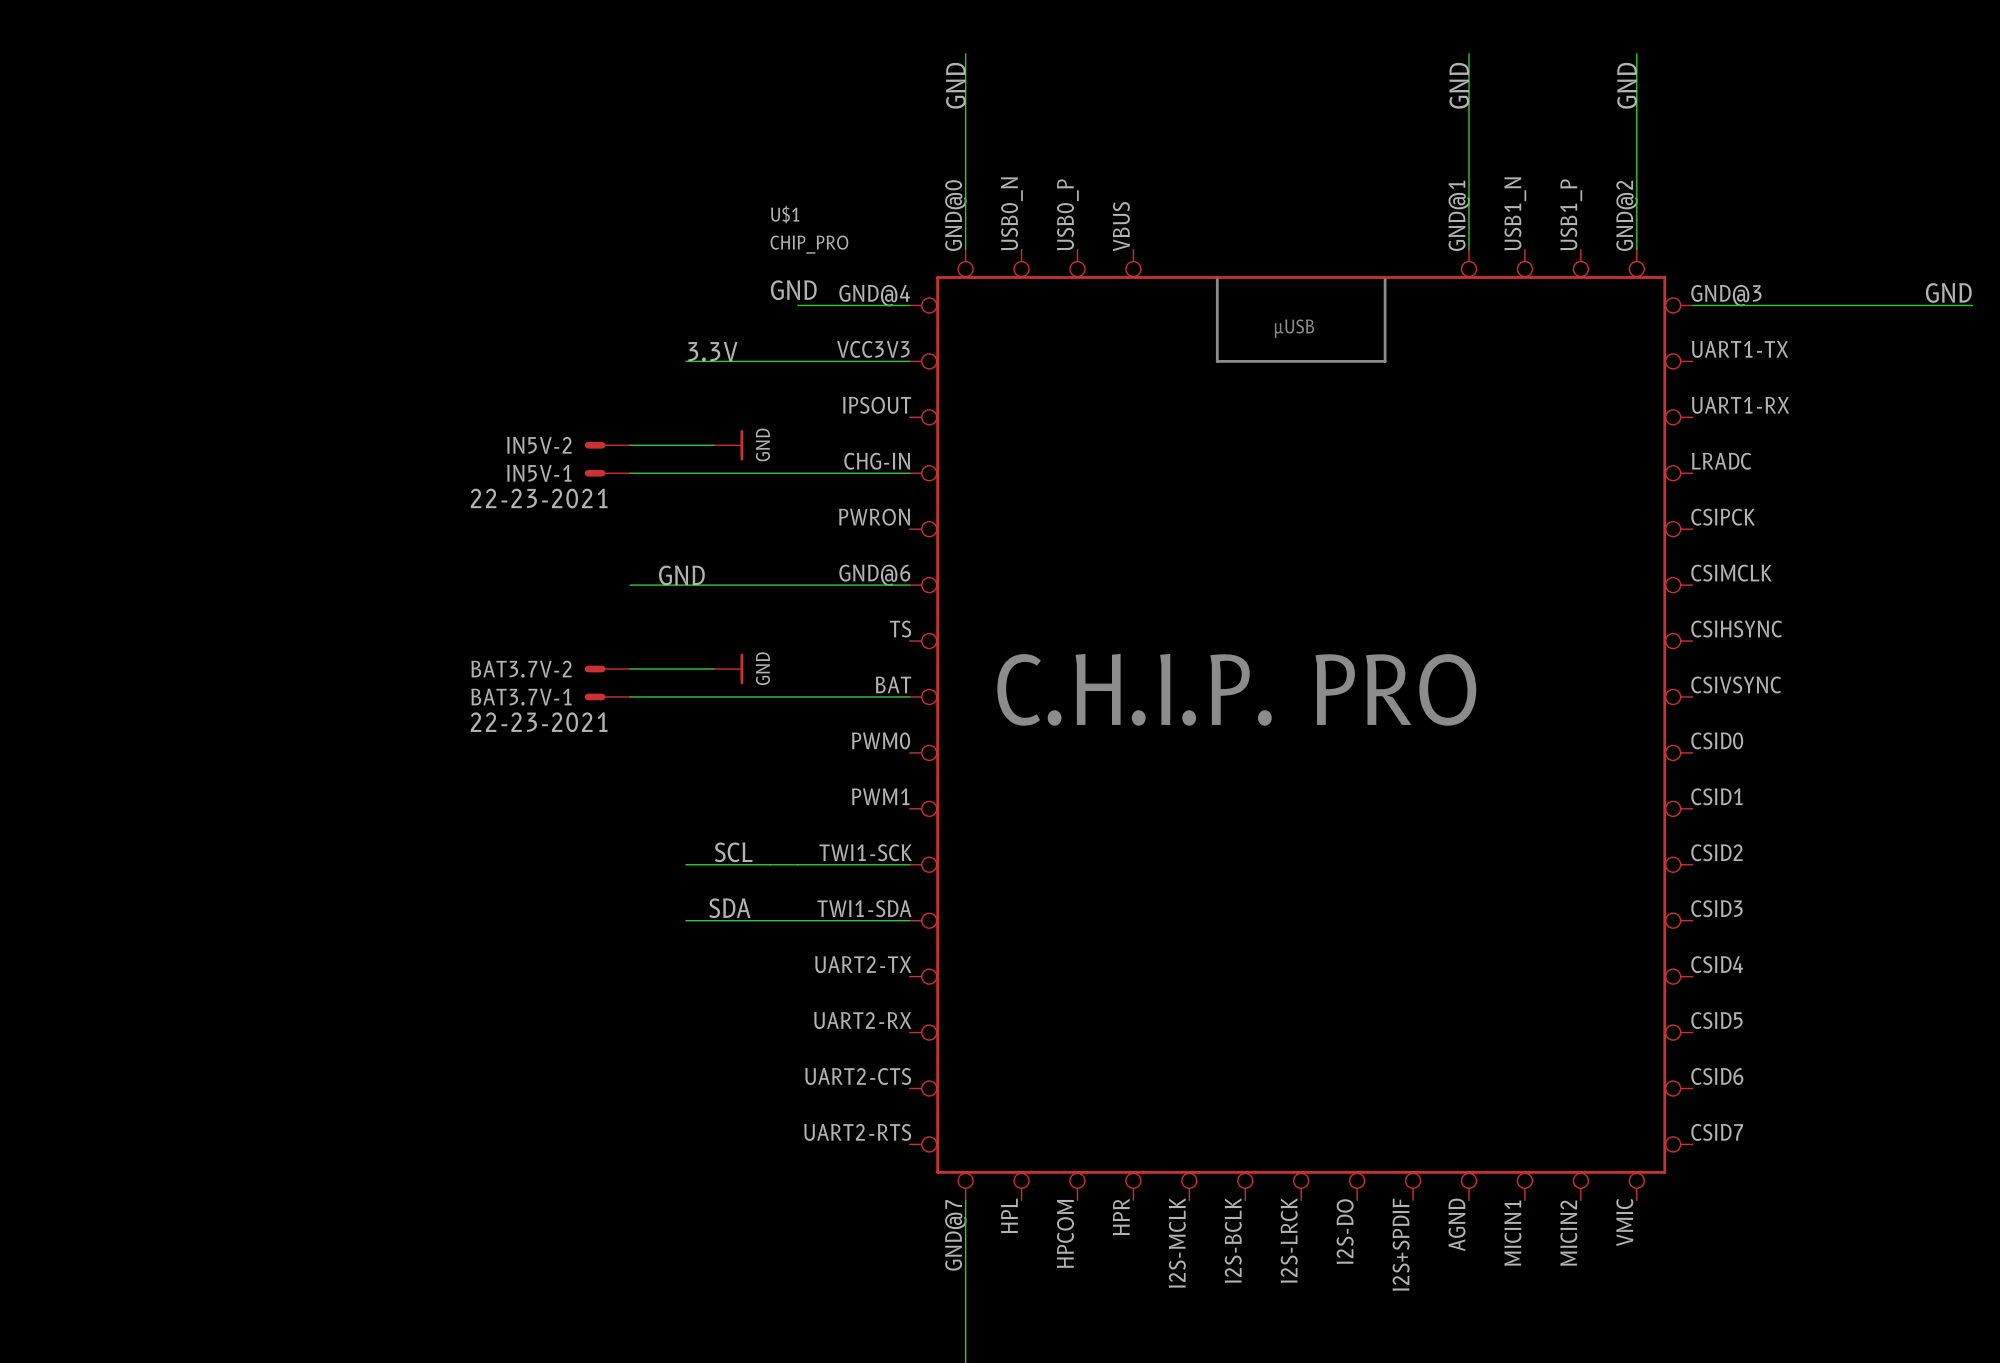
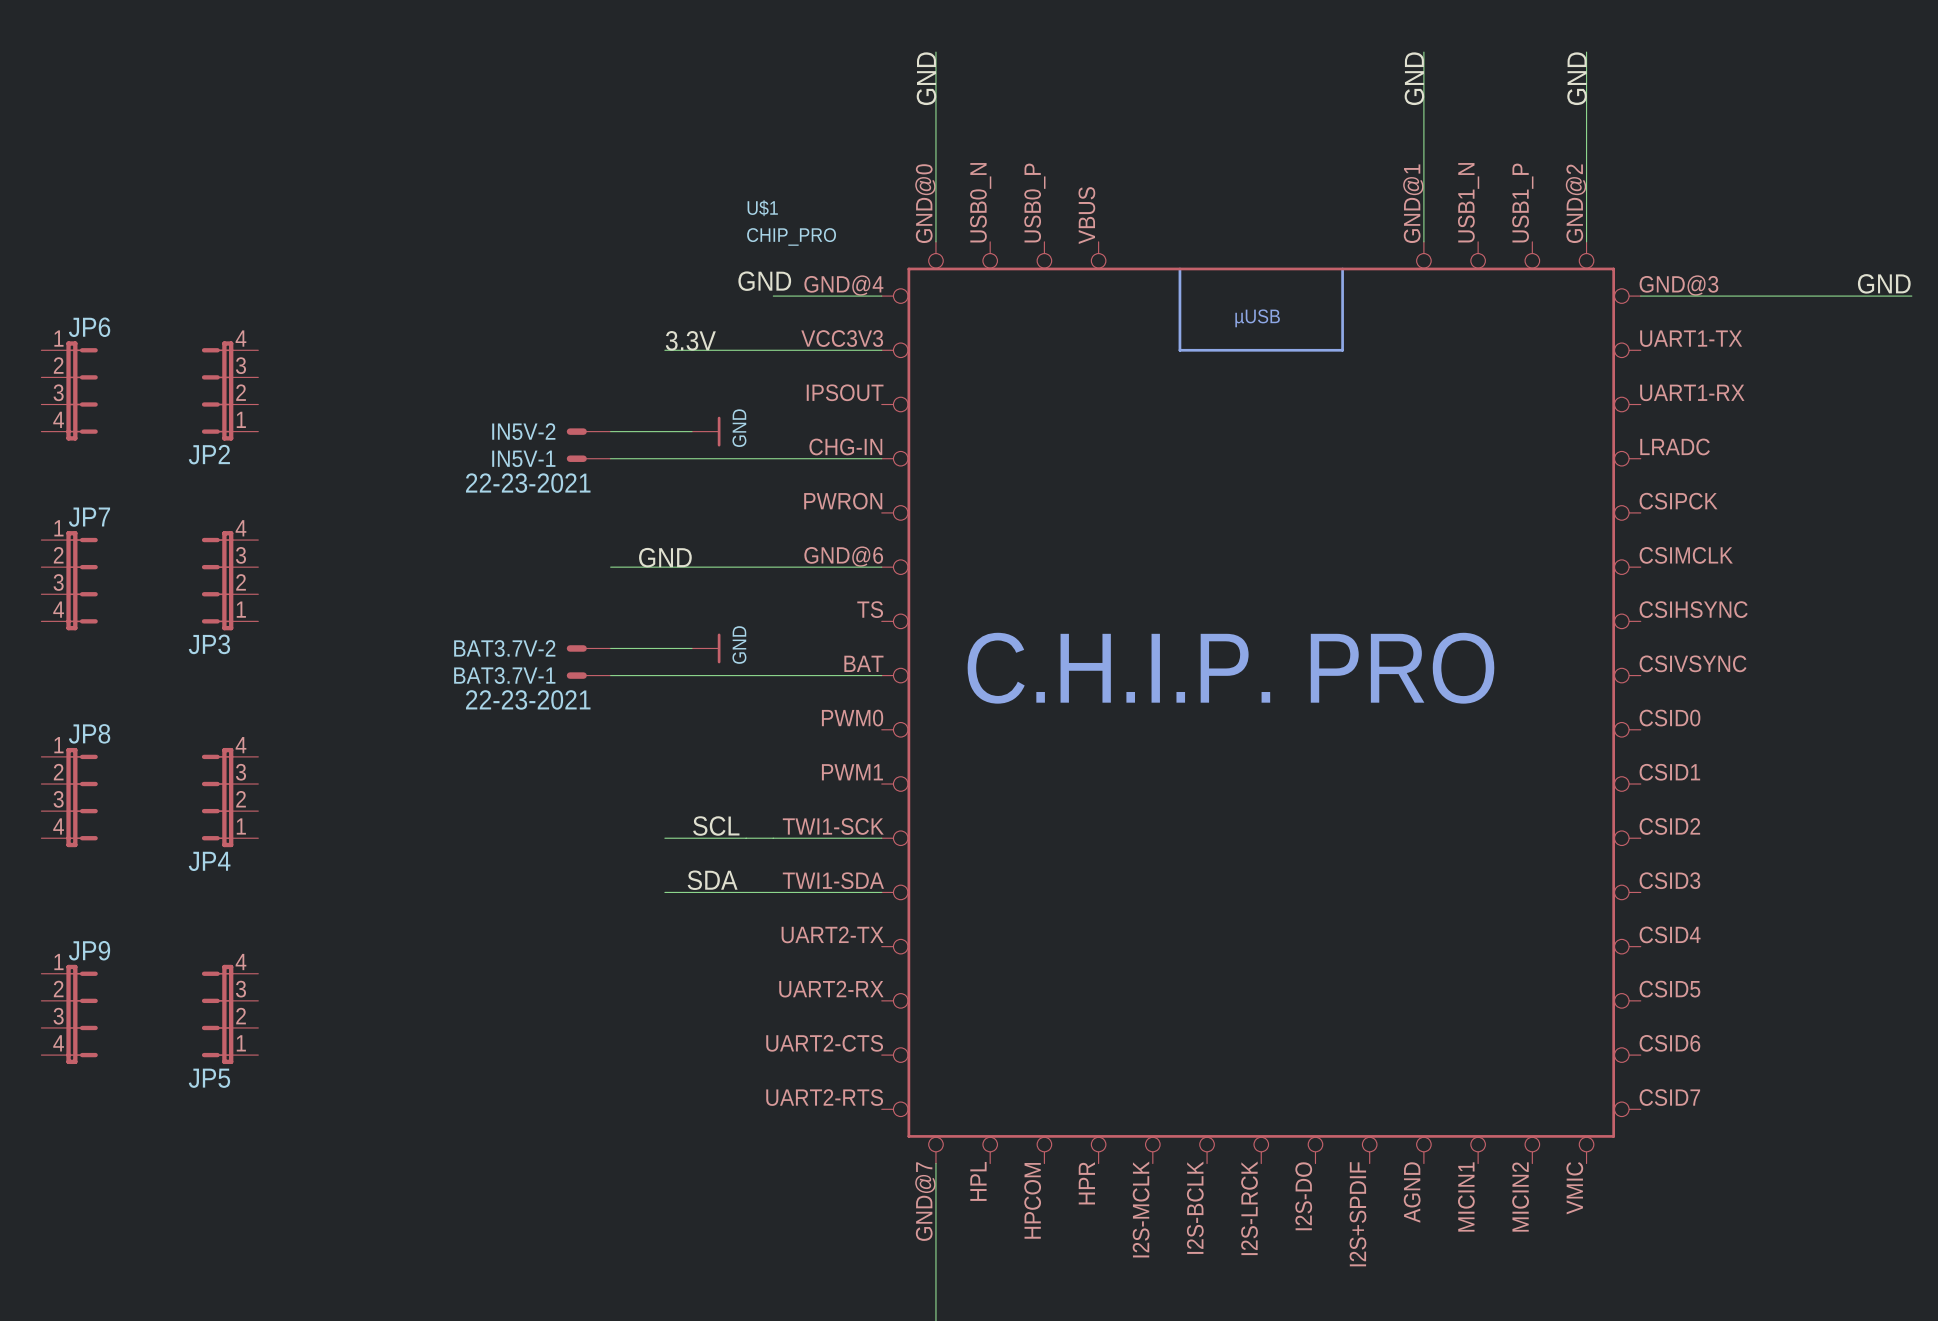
JP6: none -> (69, 390)
JP2: none -> (230, 390)
JP7: none -> (69, 580)
JP3: none -> (230, 580)
JP8: none -> (69, 797)
JP4: none -> (230, 797)
JP9: none -> (69, 1014)
JP5: none -> (230, 1014)

